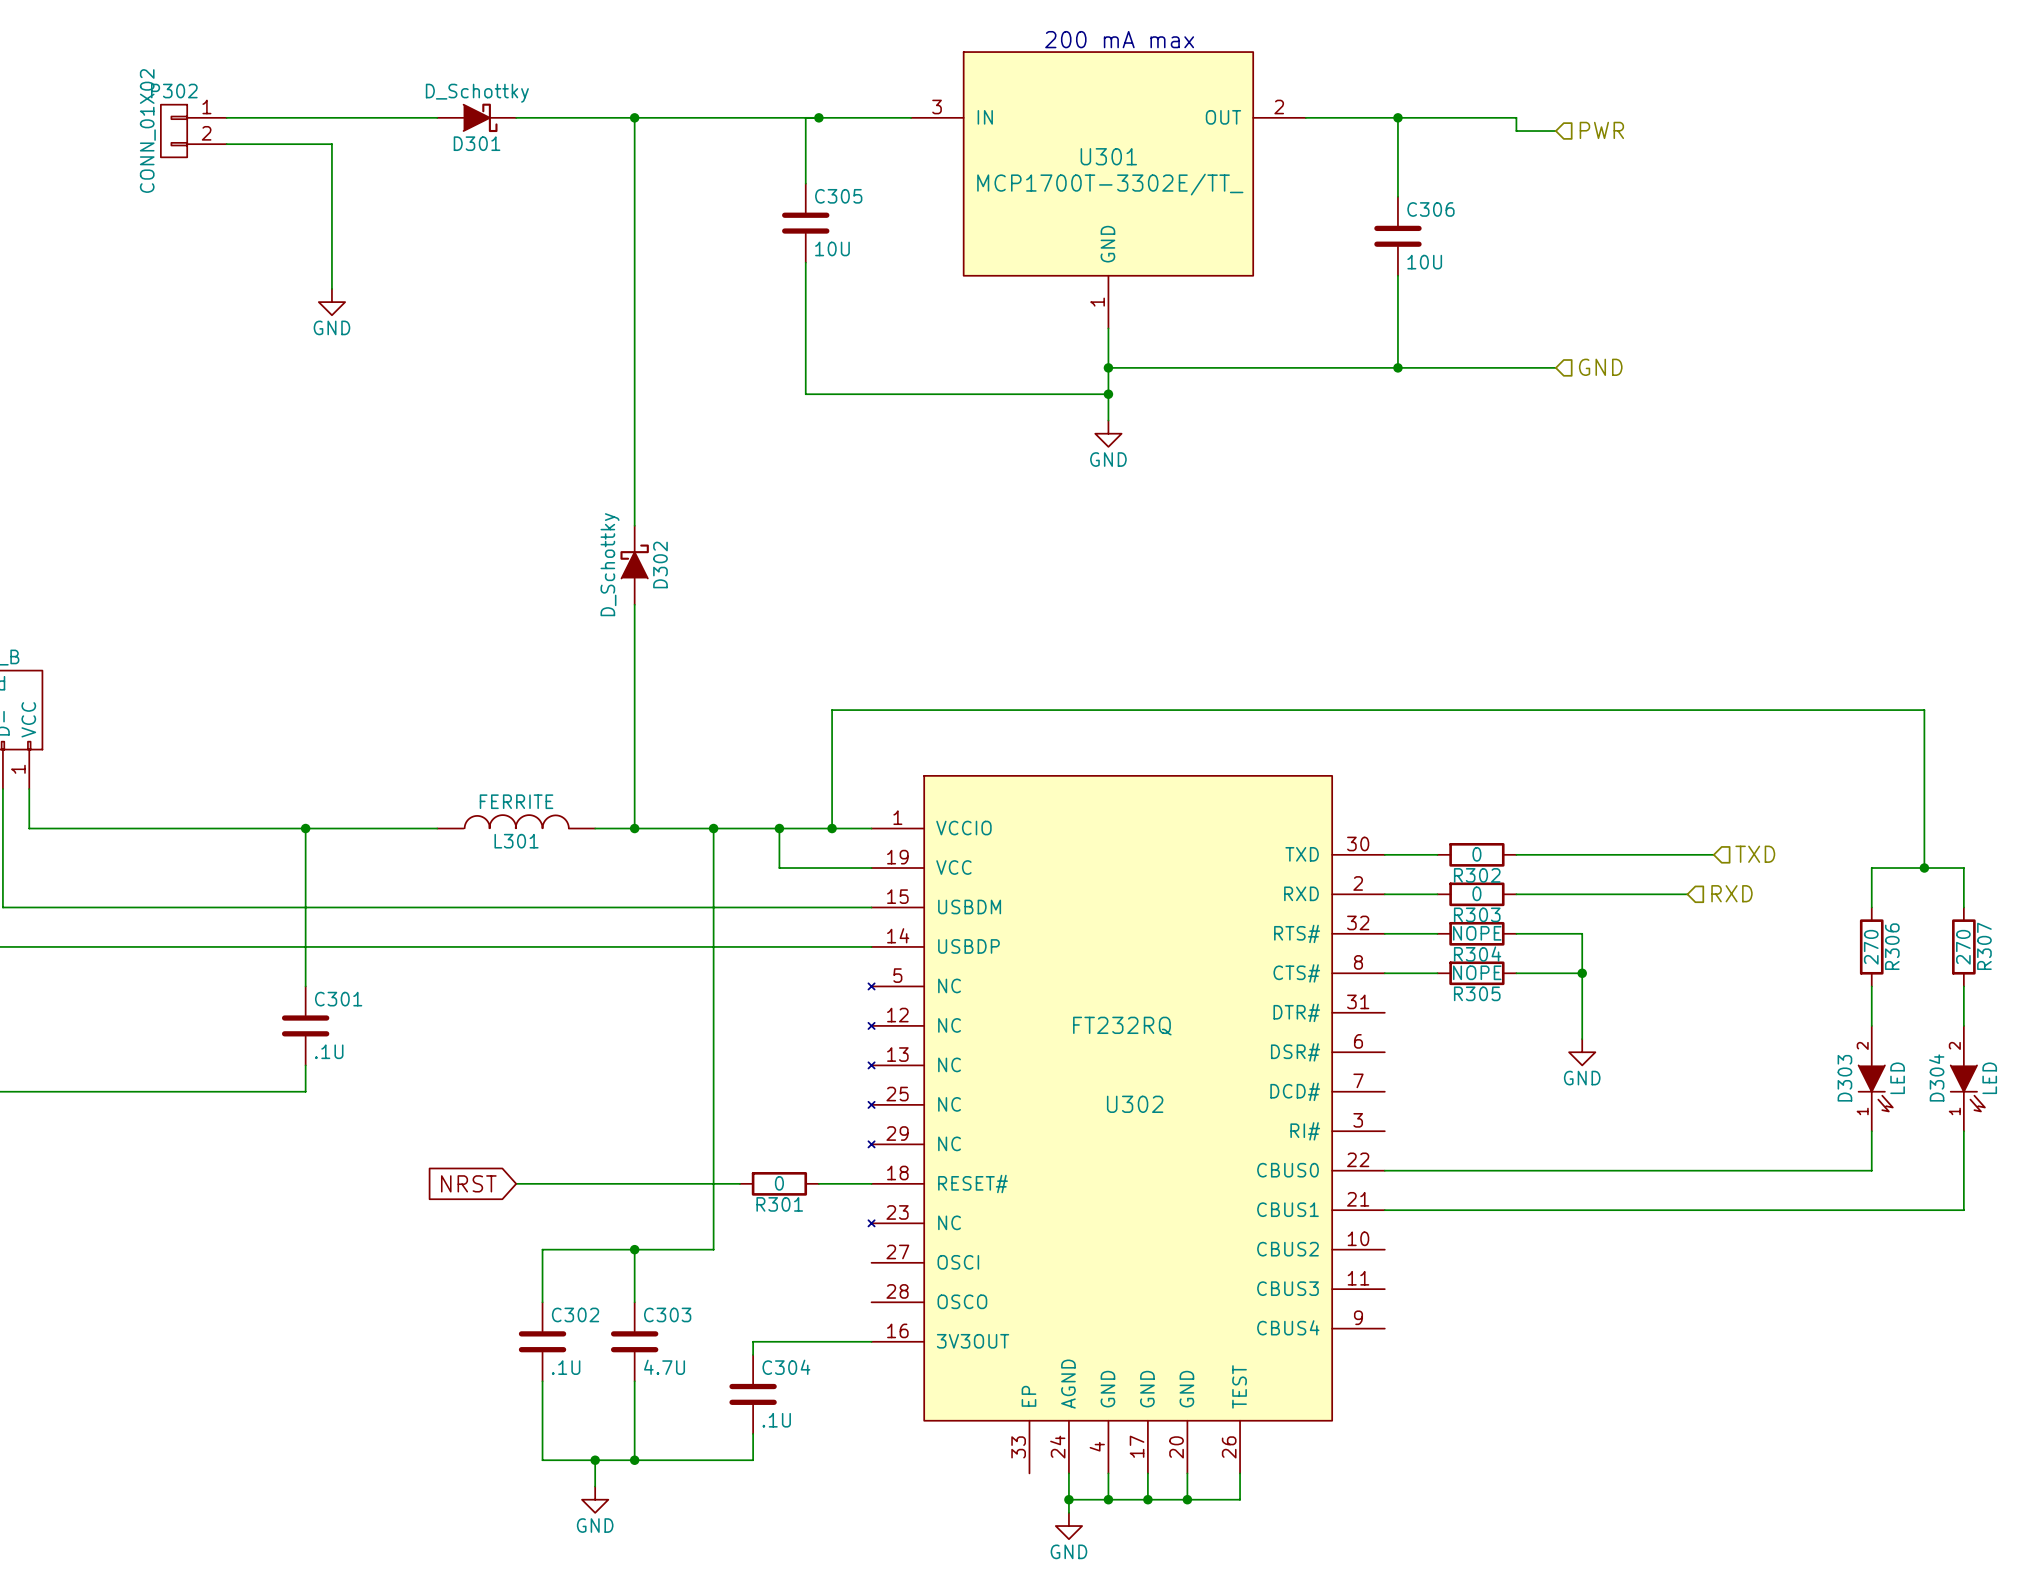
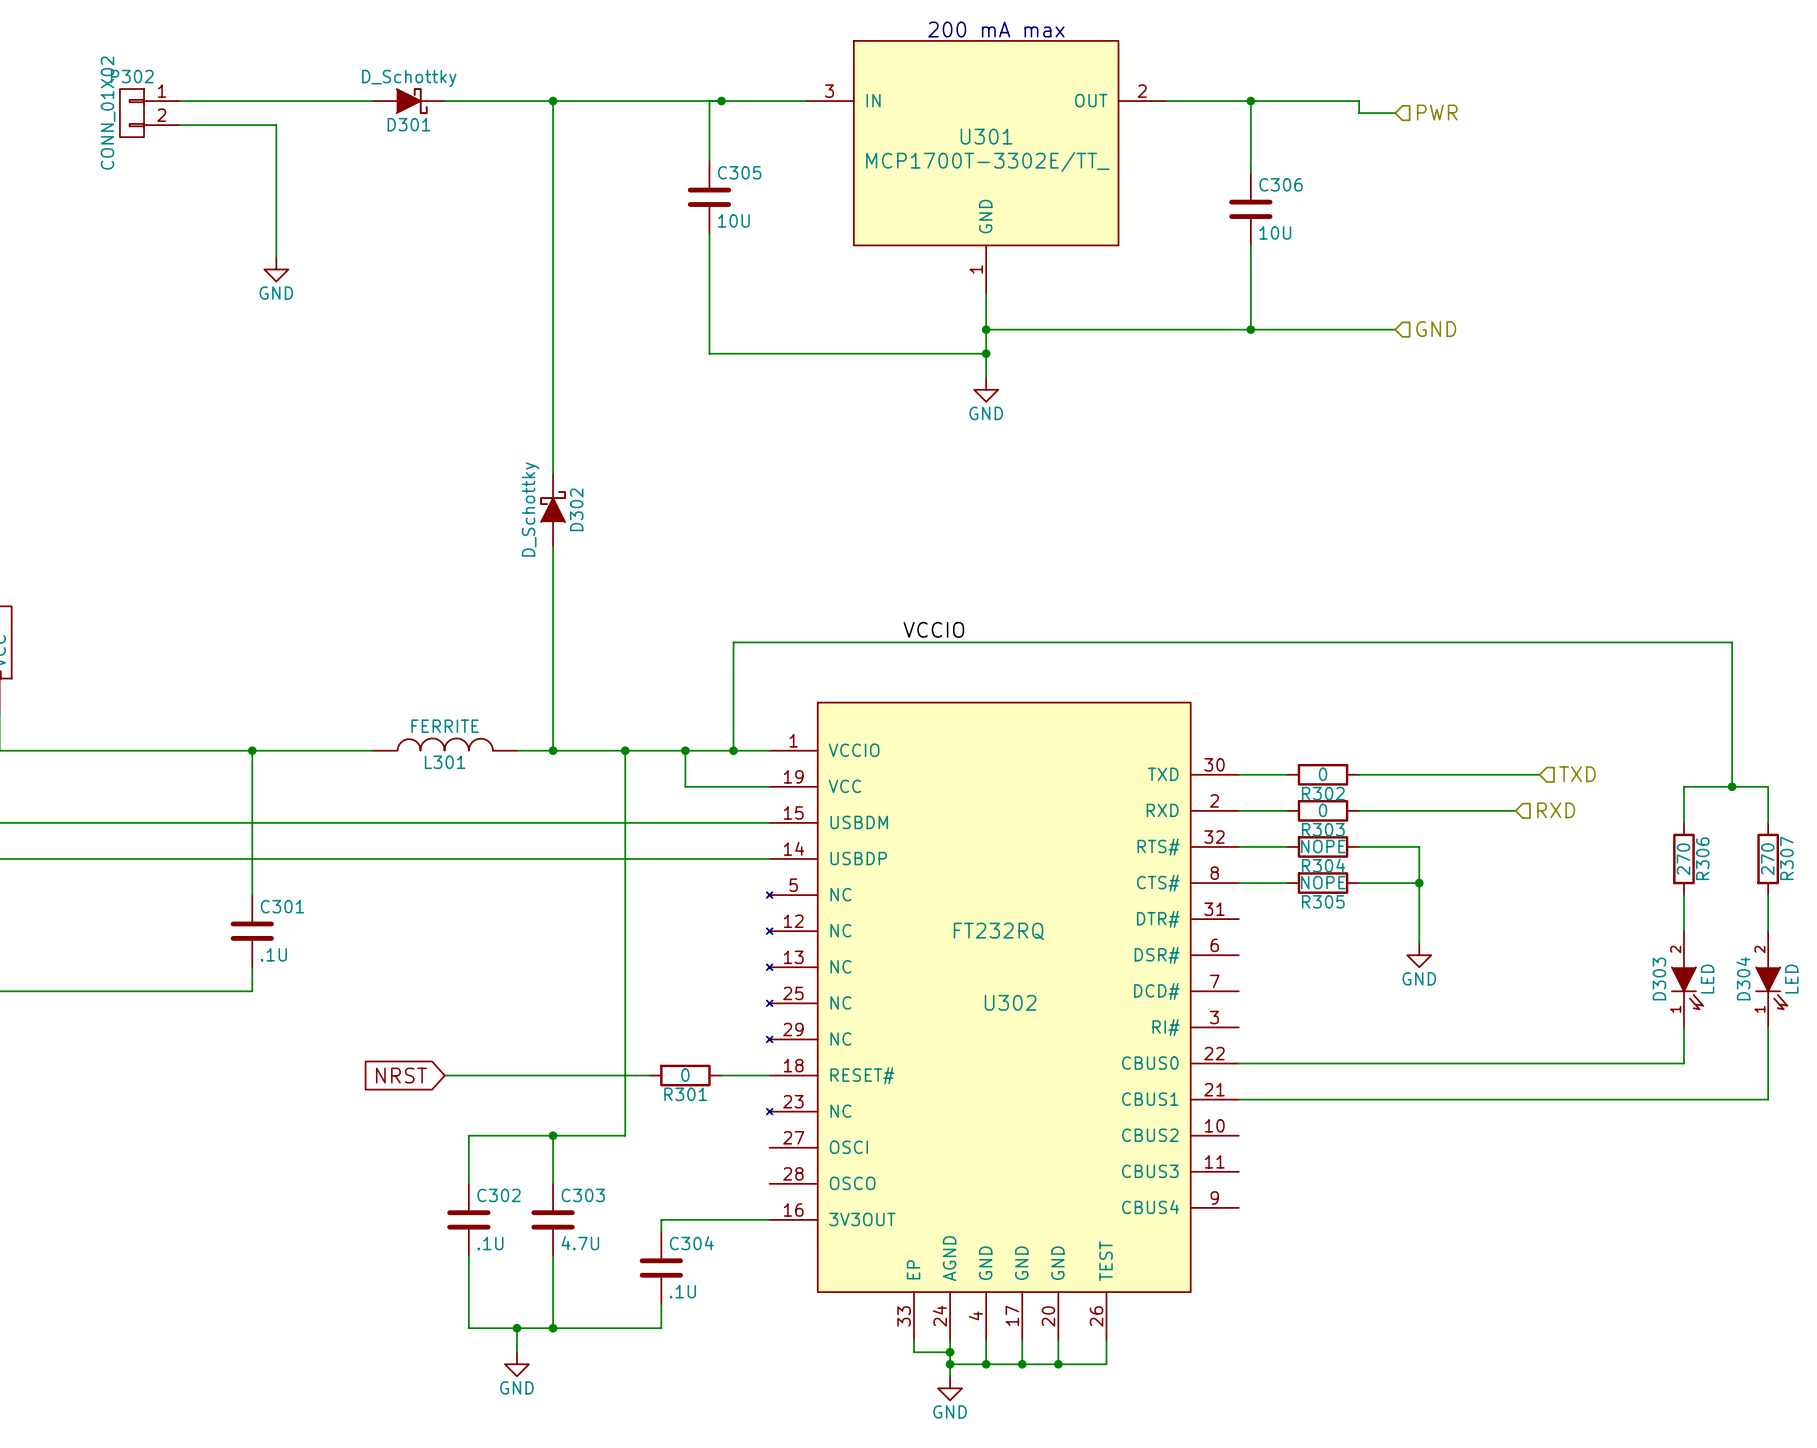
label: none -> VCCIO (933, 629)
wire: none -> (913, 1340) (913, 1352) (950, 1352)
junction: none -> (950, 1352)

